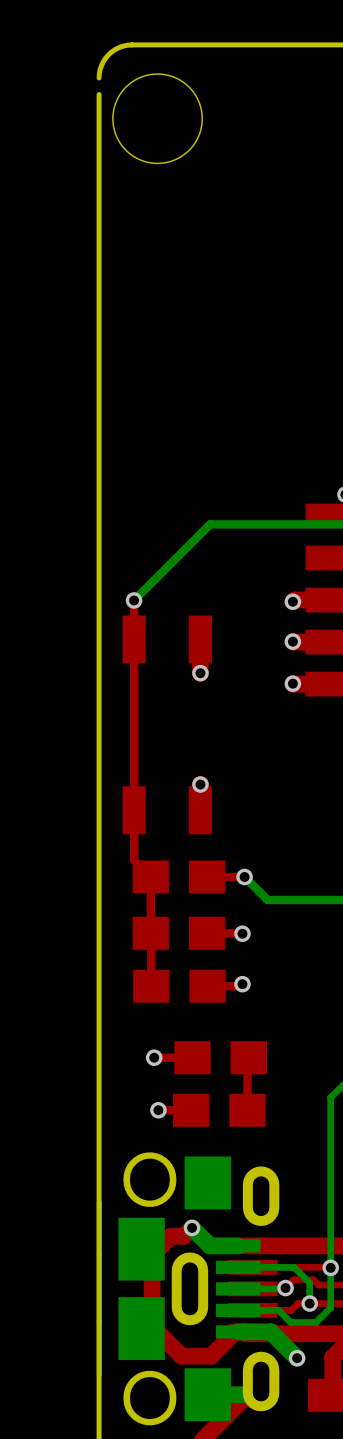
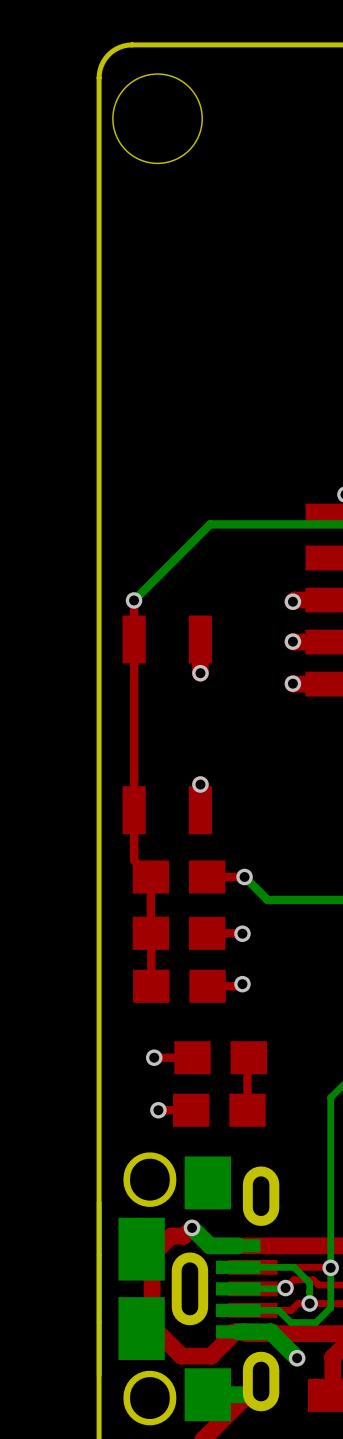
board edge: none -> (99, 77) (99, 94)

